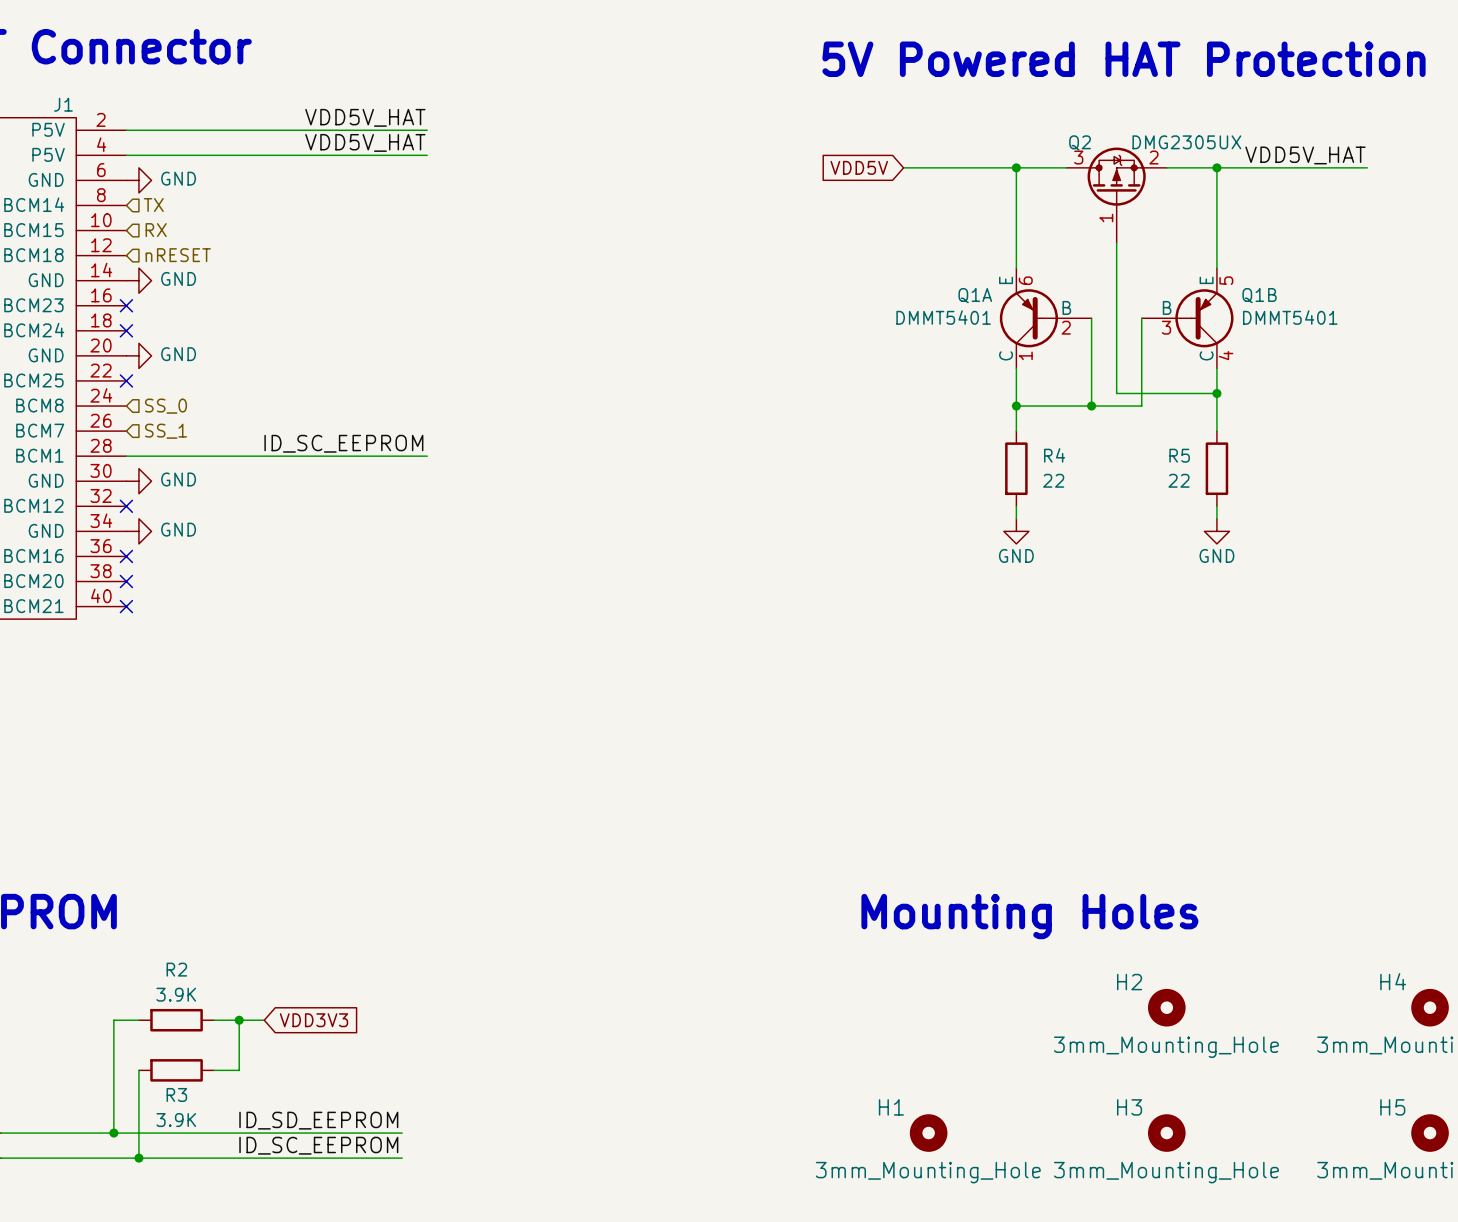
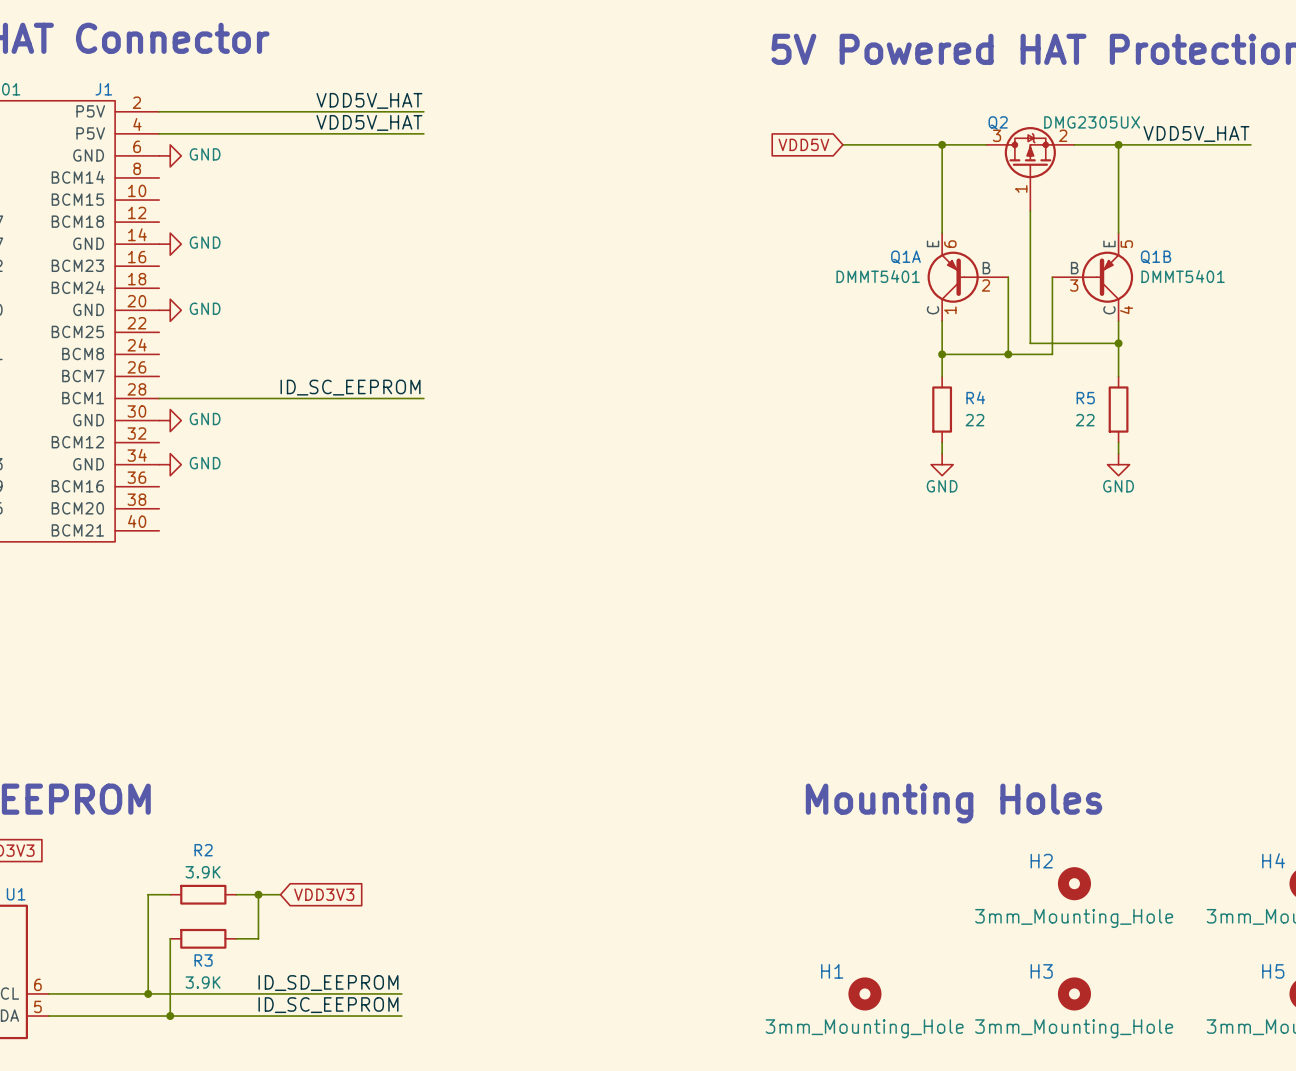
hierarchical label: TX (153, 205) -> none
hierarchical label: RX (156, 230) -> none
hierarchical label: nRESET (178, 255) -> none
no-connect mark: (126, 305) -> none
no-connect mark: (126, 330) -> none
no-connect mark: (126, 380) -> none
hierarchical label: SS_0 (166, 406) -> none
hierarchical label: SS_1 (166, 431) -> none
no-connect mark: (126, 506) -> none
no-connect mark: (126, 556) -> none
no-connect mark: (126, 581) -> none
no-connect mark: (126, 606) -> none

